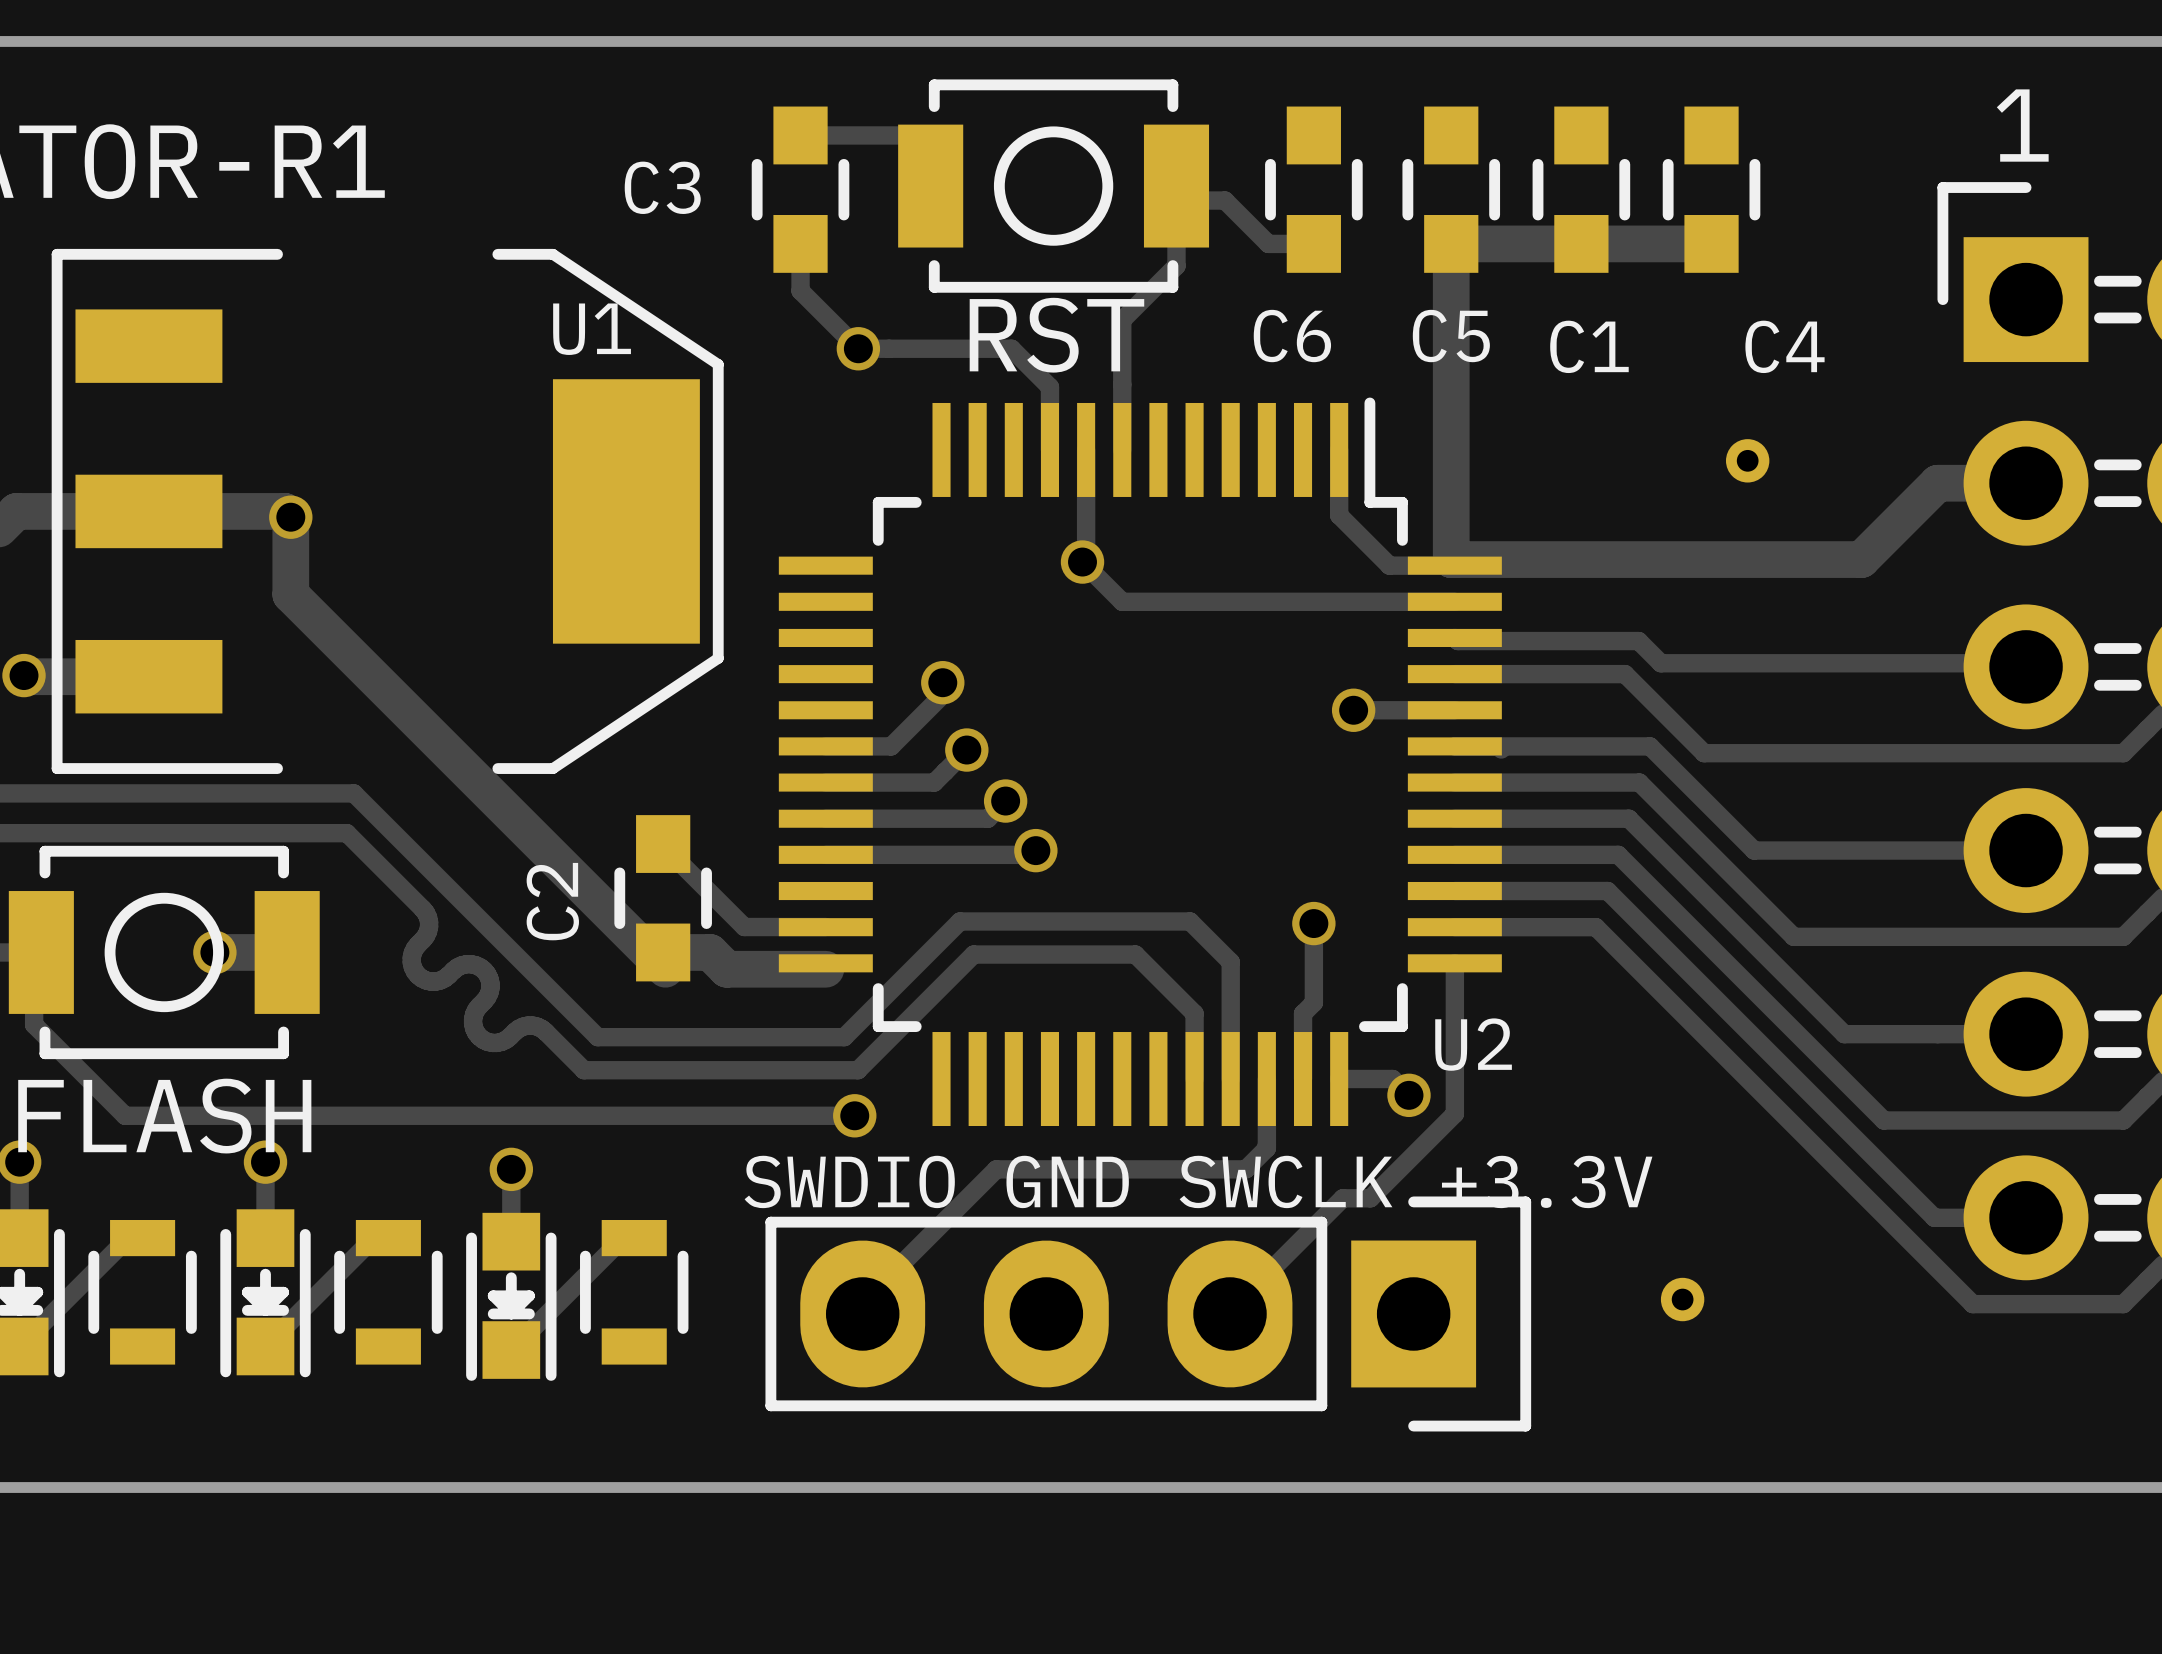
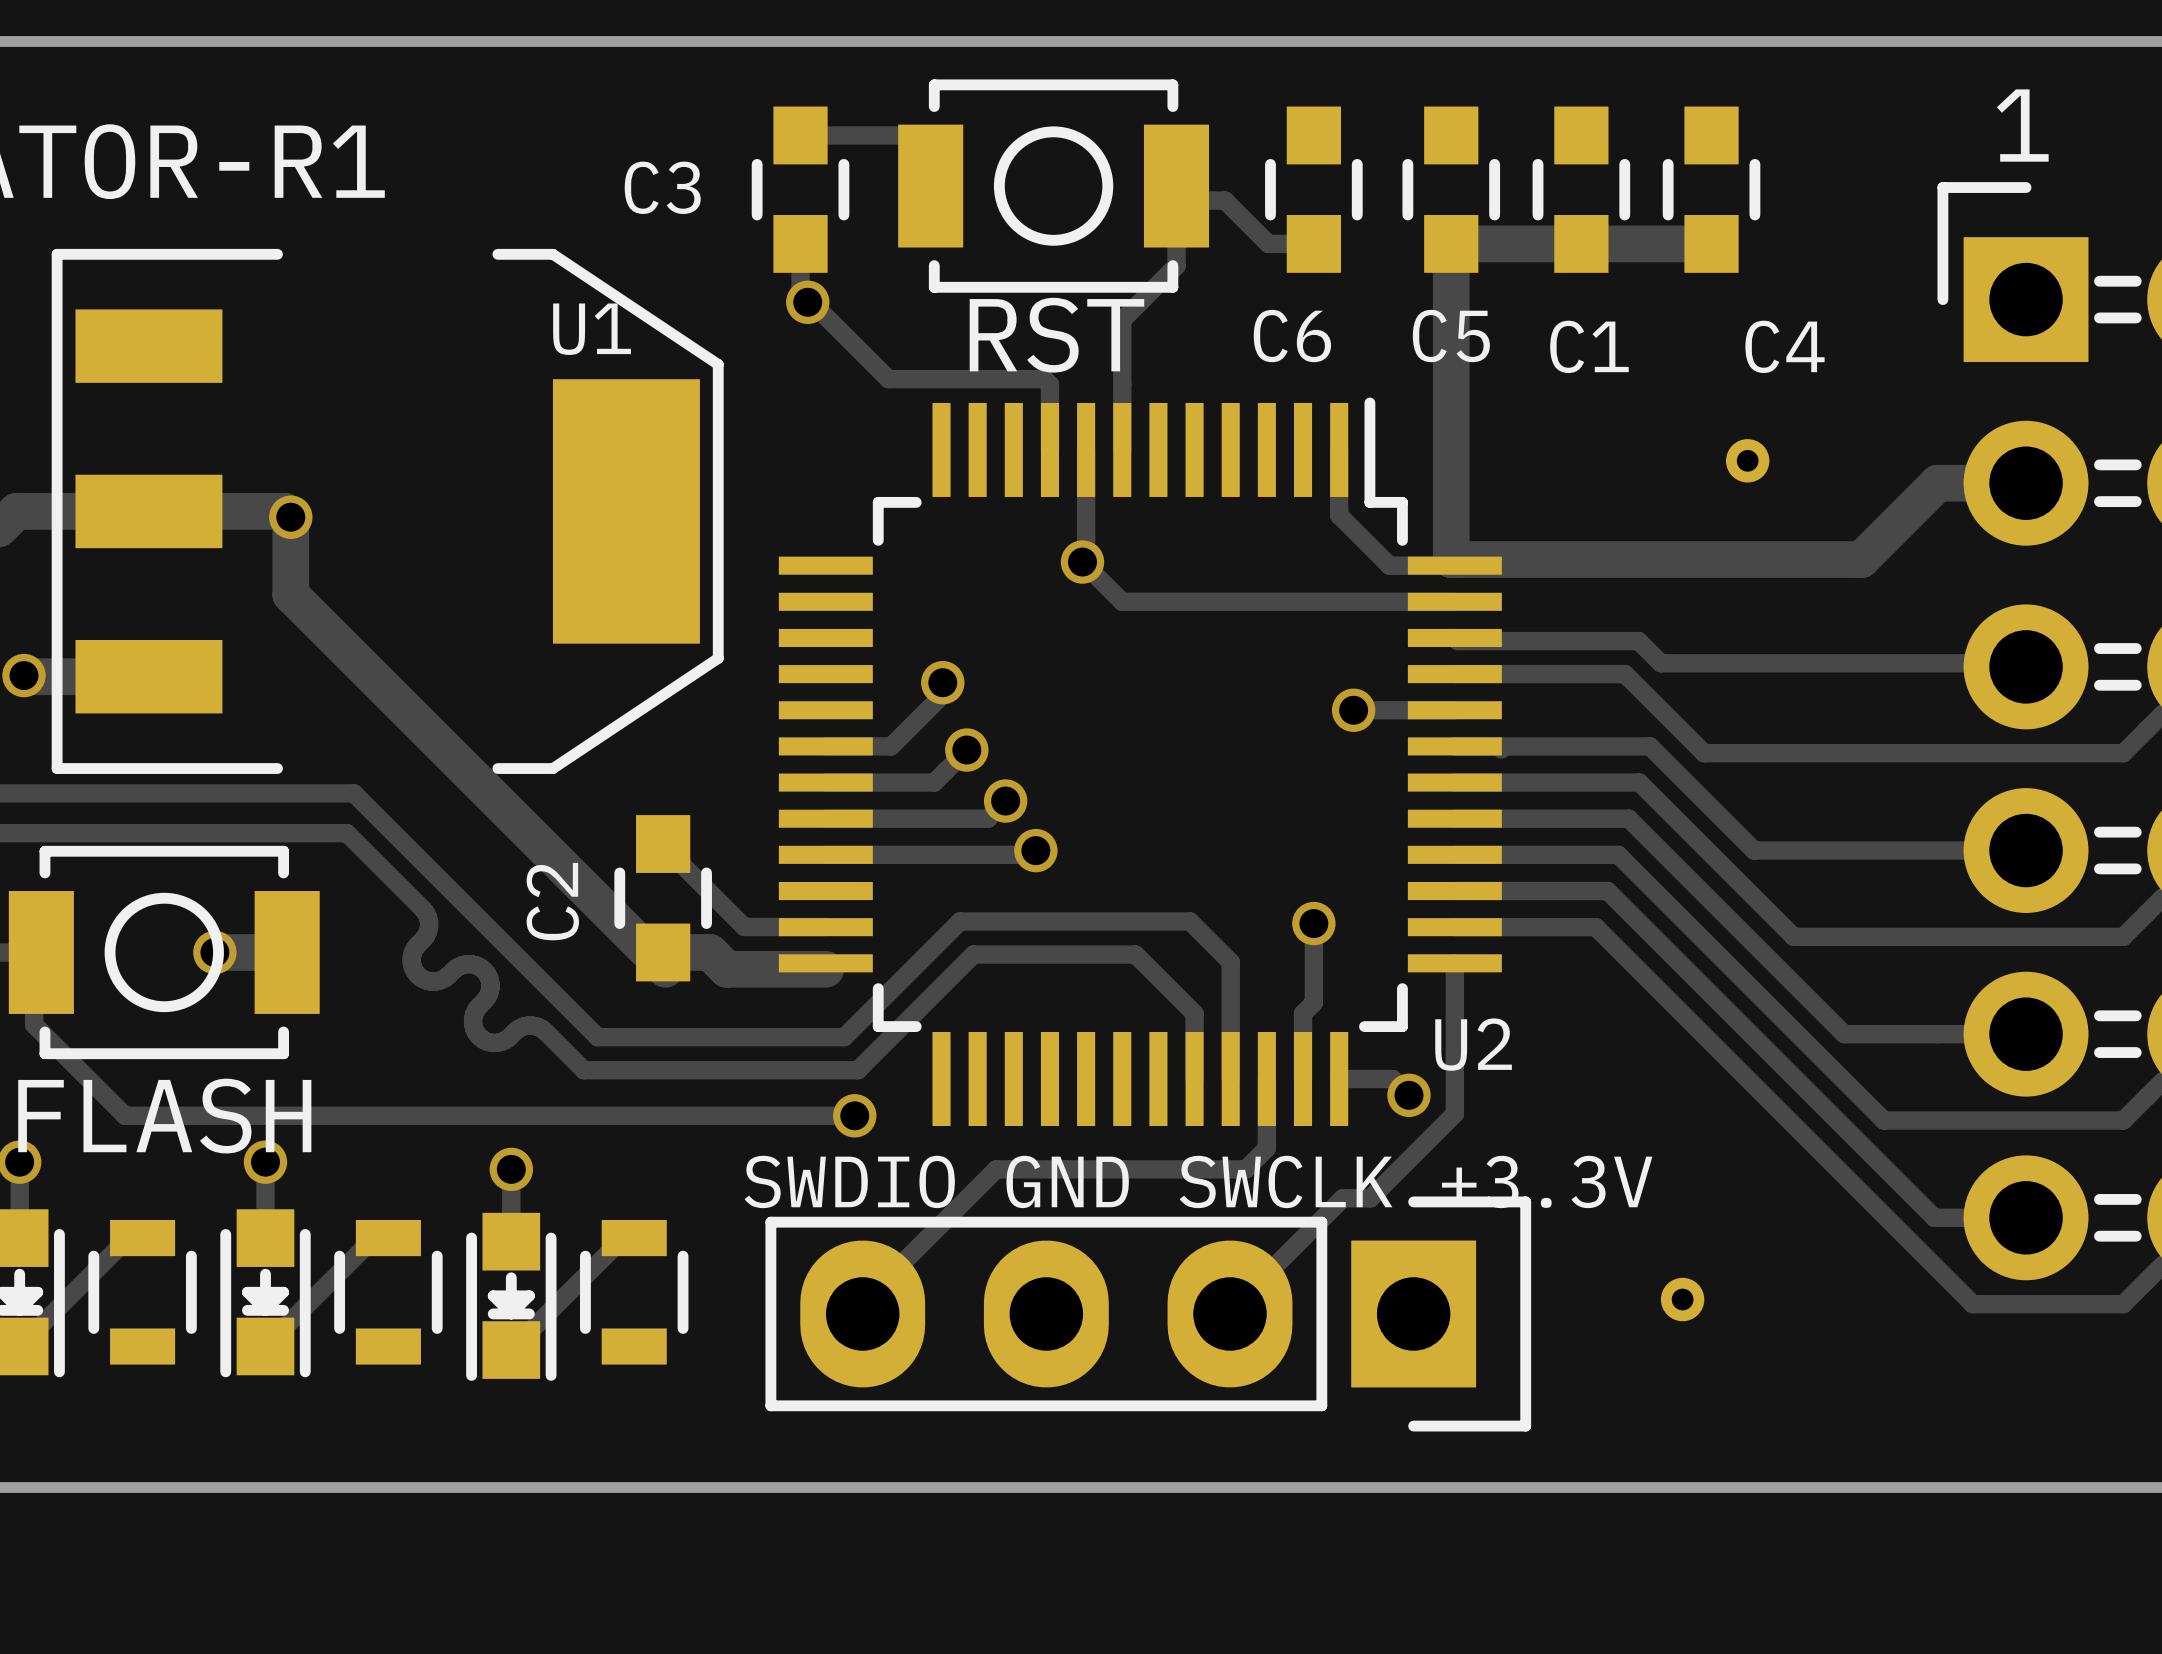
track: (858, 348) (1011, 348) (1049, 387) -> (858, 348) (888, 379) (1044, 379) (1049, 387)
via position: (858, 348) -> (807, 302)

